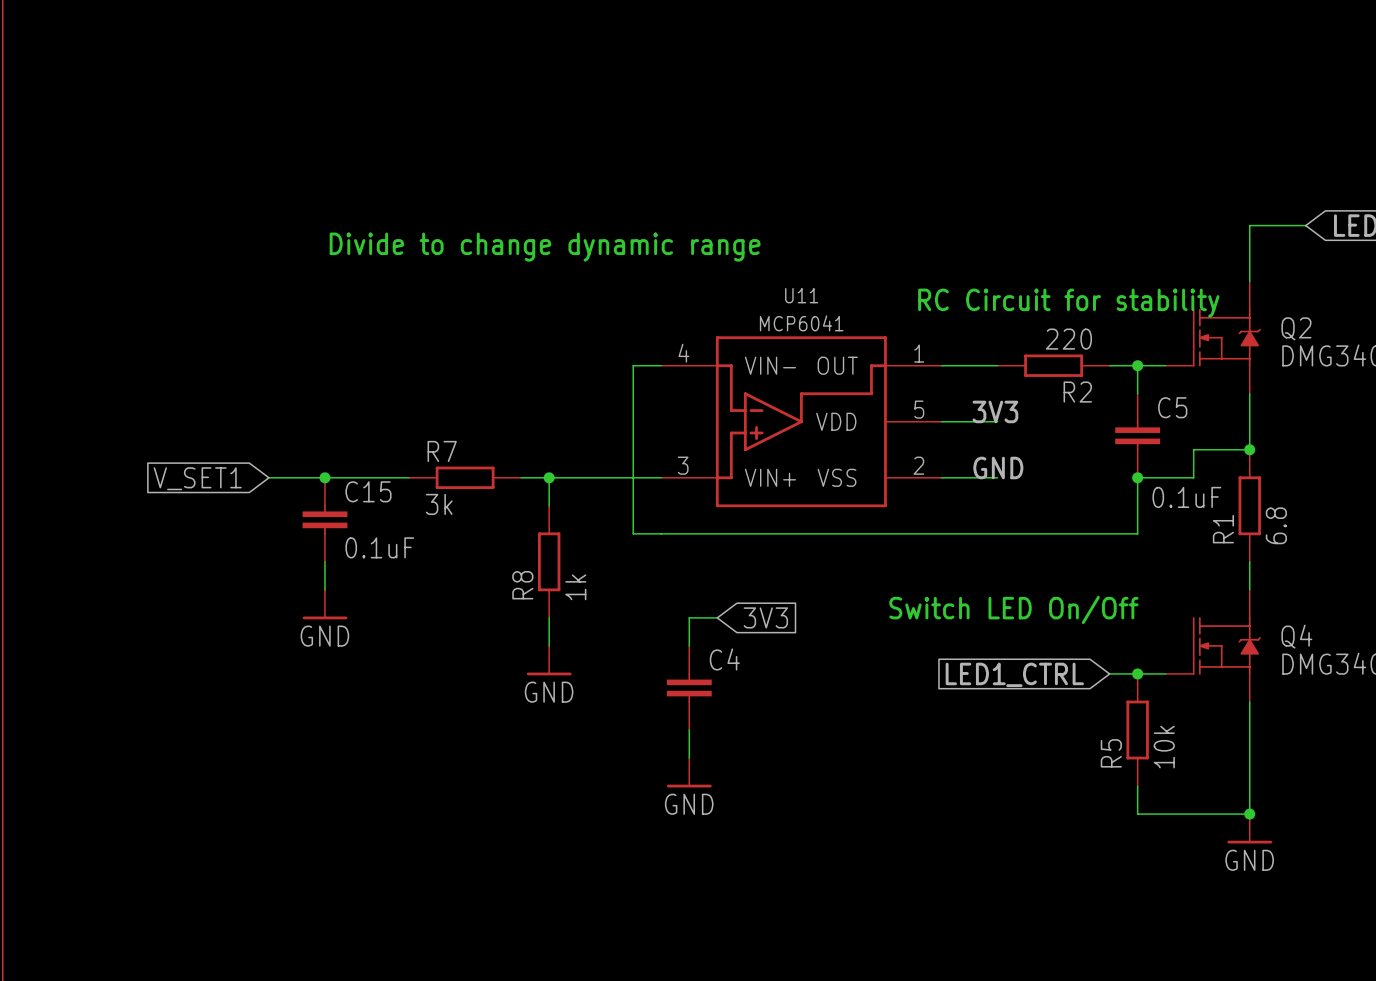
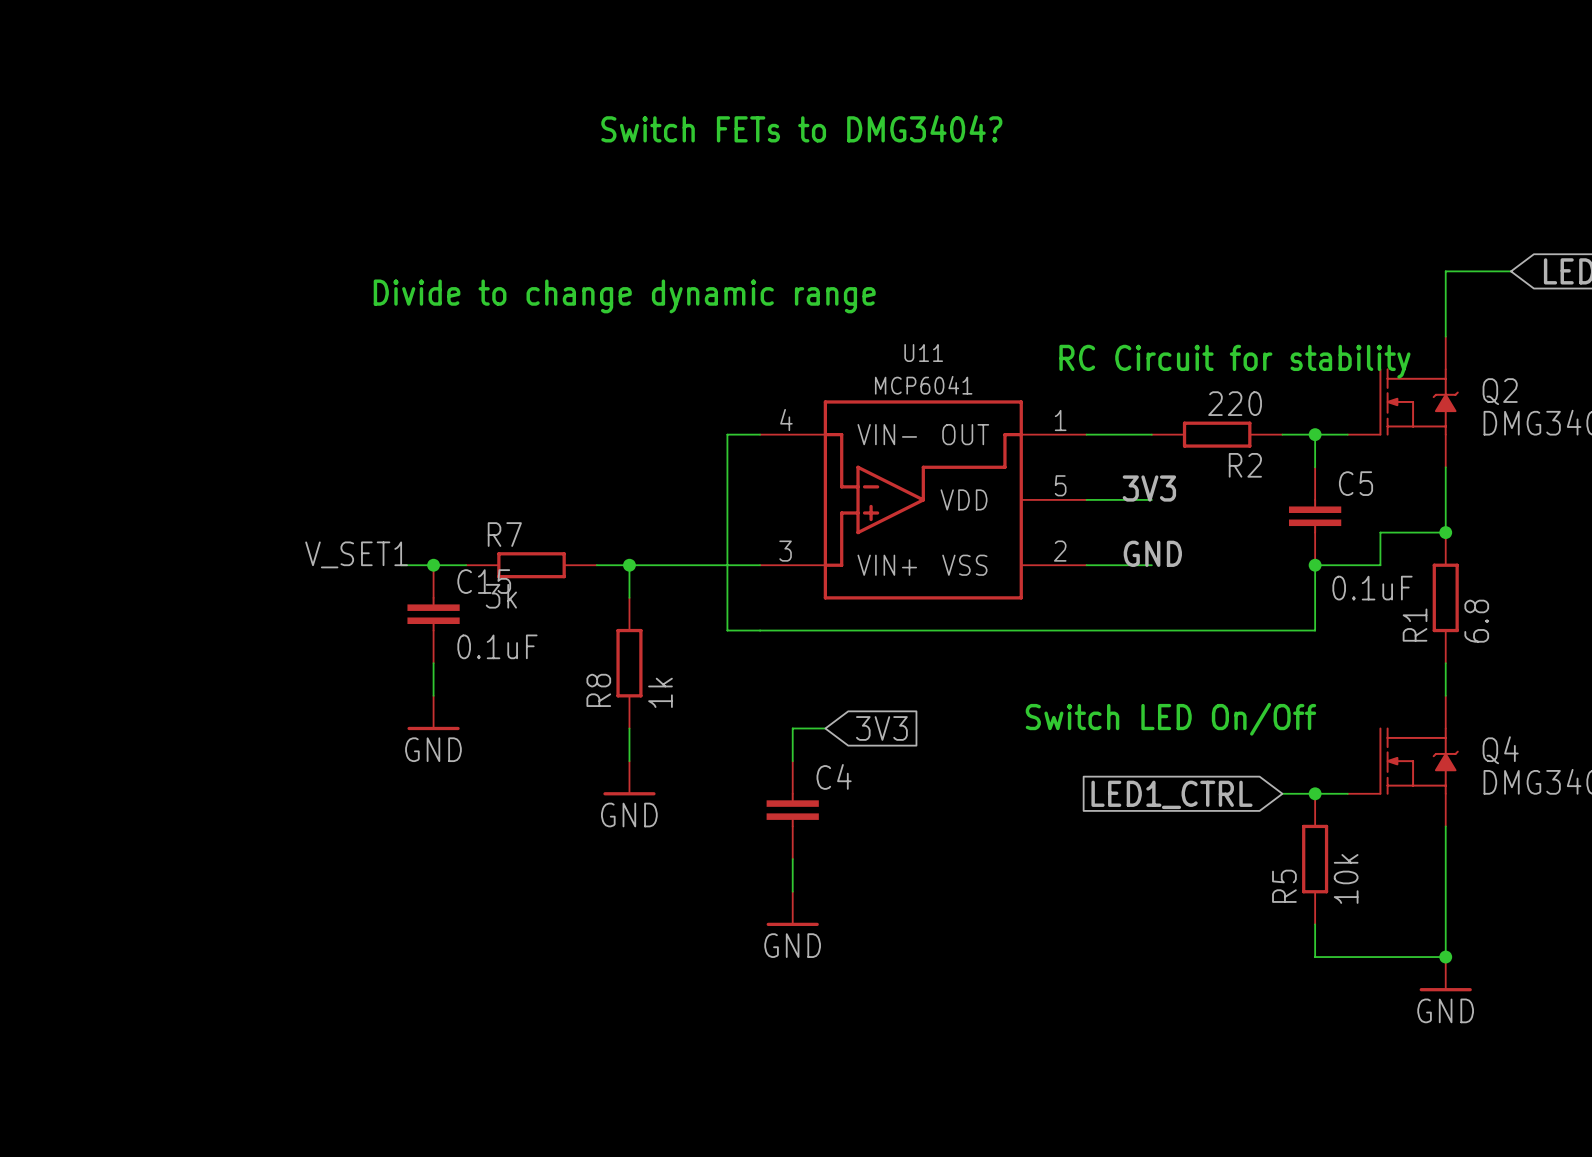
text: none -> Switch FETs to DMG3404? (801, 128)
label: none -> V_SET1 (356, 554)
wire: (268, 477) (353, 477) -> none
junction position: (324, 477) -> (433, 565)
global label: V_SET1 (197, 478) -> none
C15 position: (324, 519) -> (433, 614)
wire: (324, 561) (324, 589) -> (433, 663) (433, 695)
power symbol position: GND (324, 604) -> GND (433, 712)

